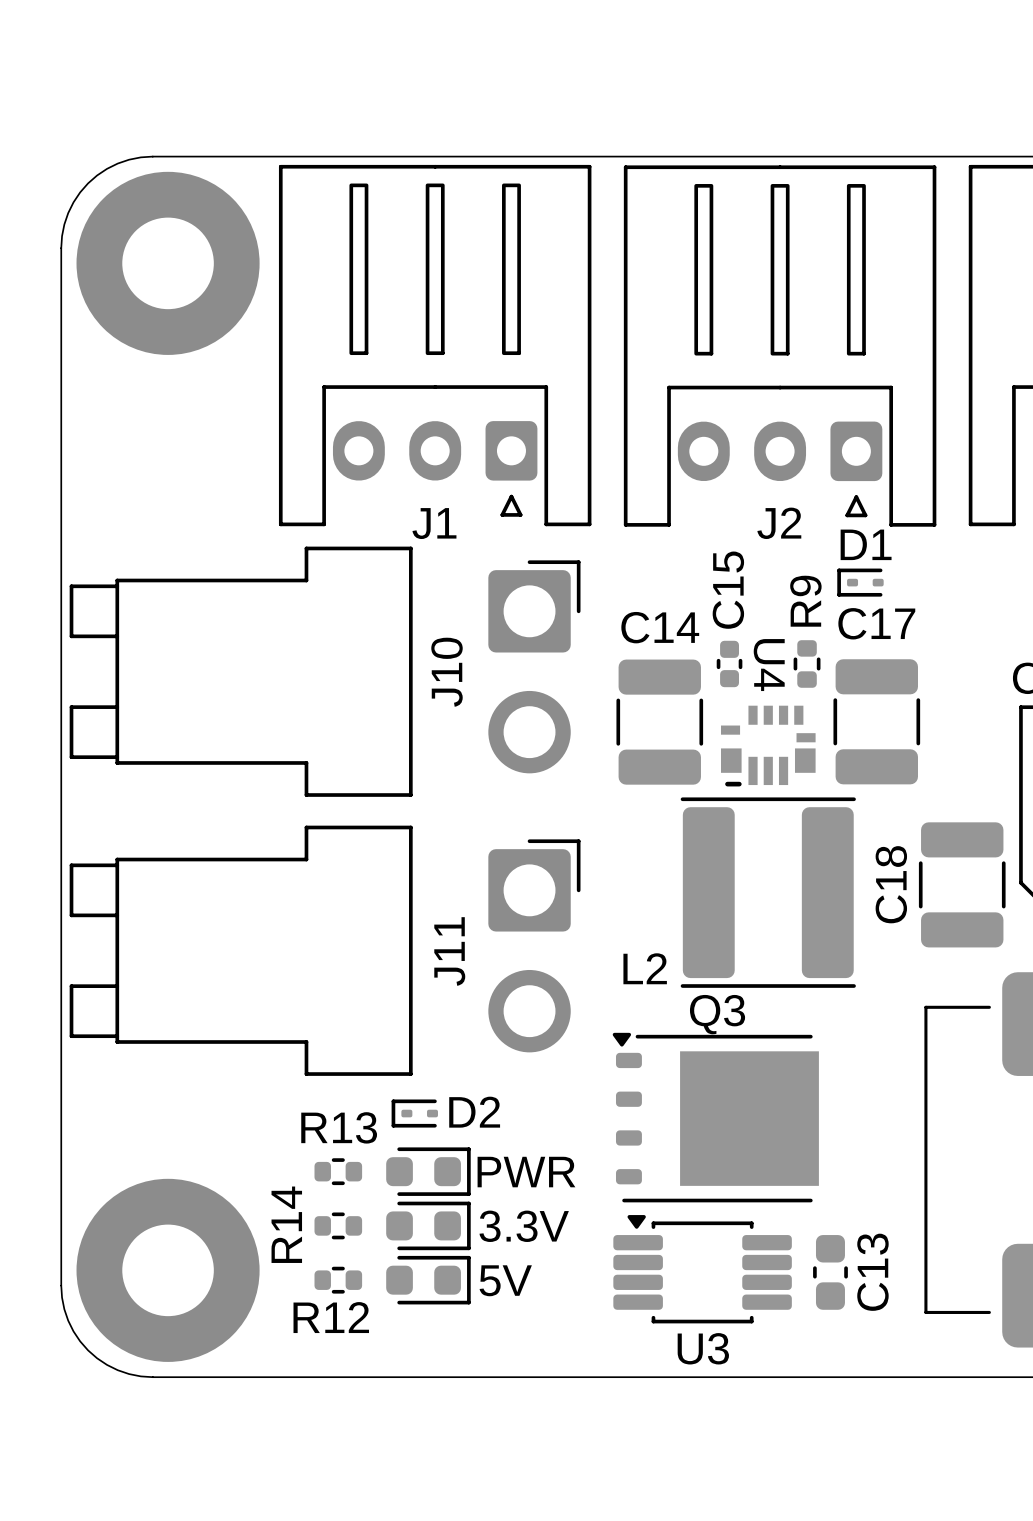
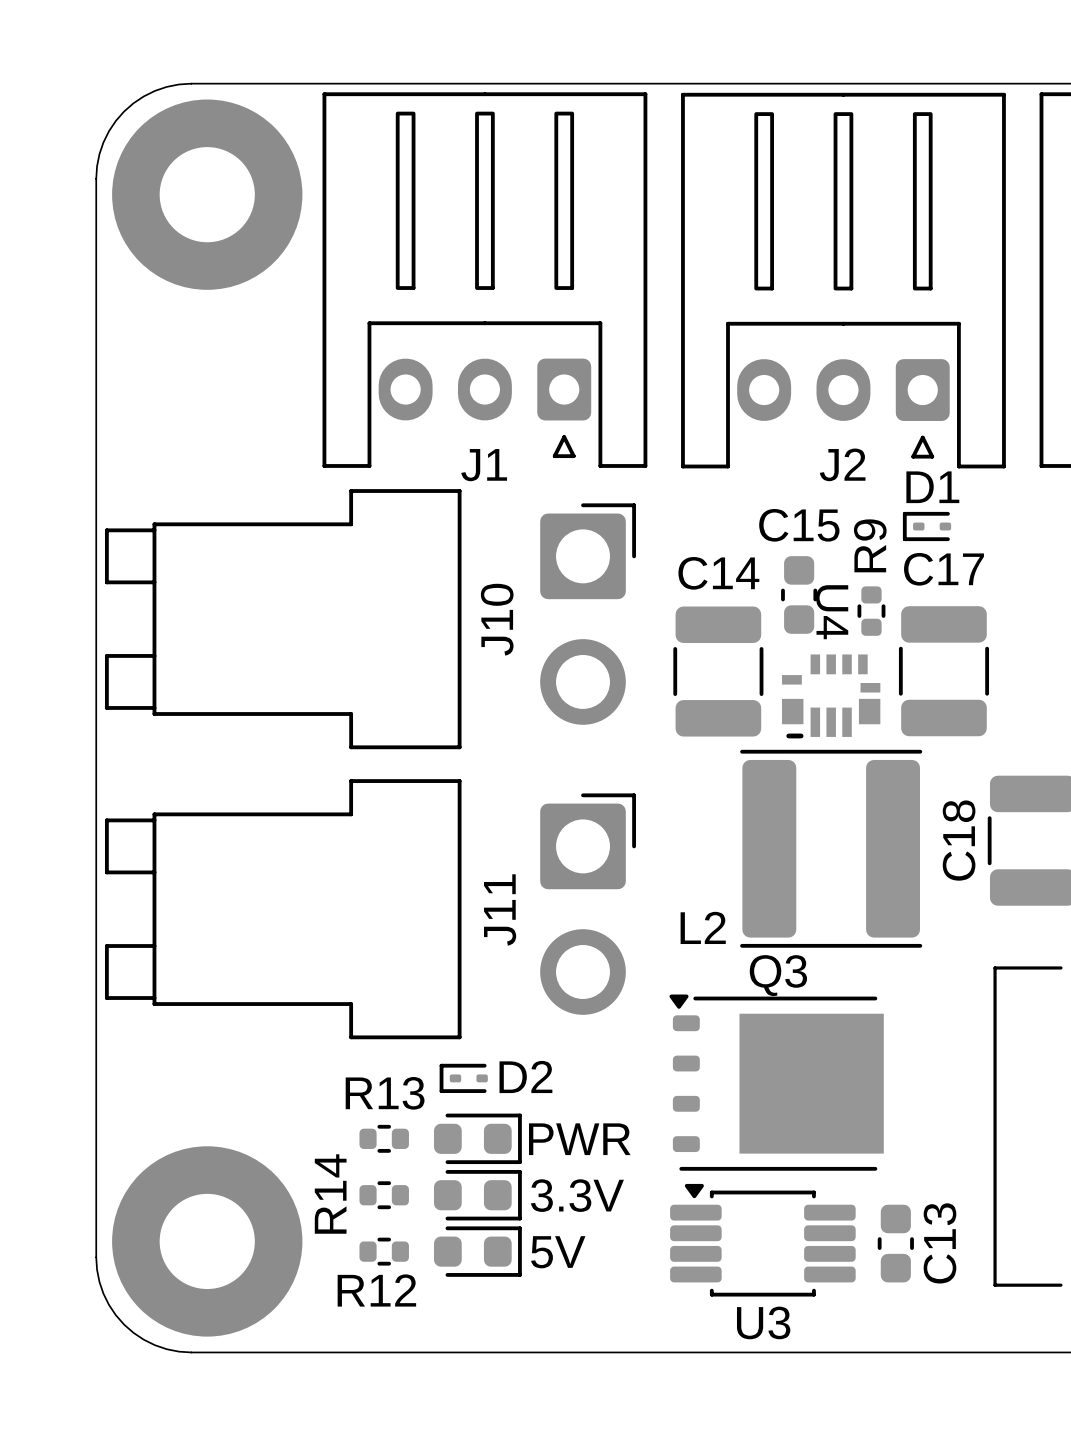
C15 name rotation: 0° (728, 590) -> 90° clockwise (799, 525)
C15 footprint: [716, 640, 743, 688] -> [781, 556, 818, 634]

